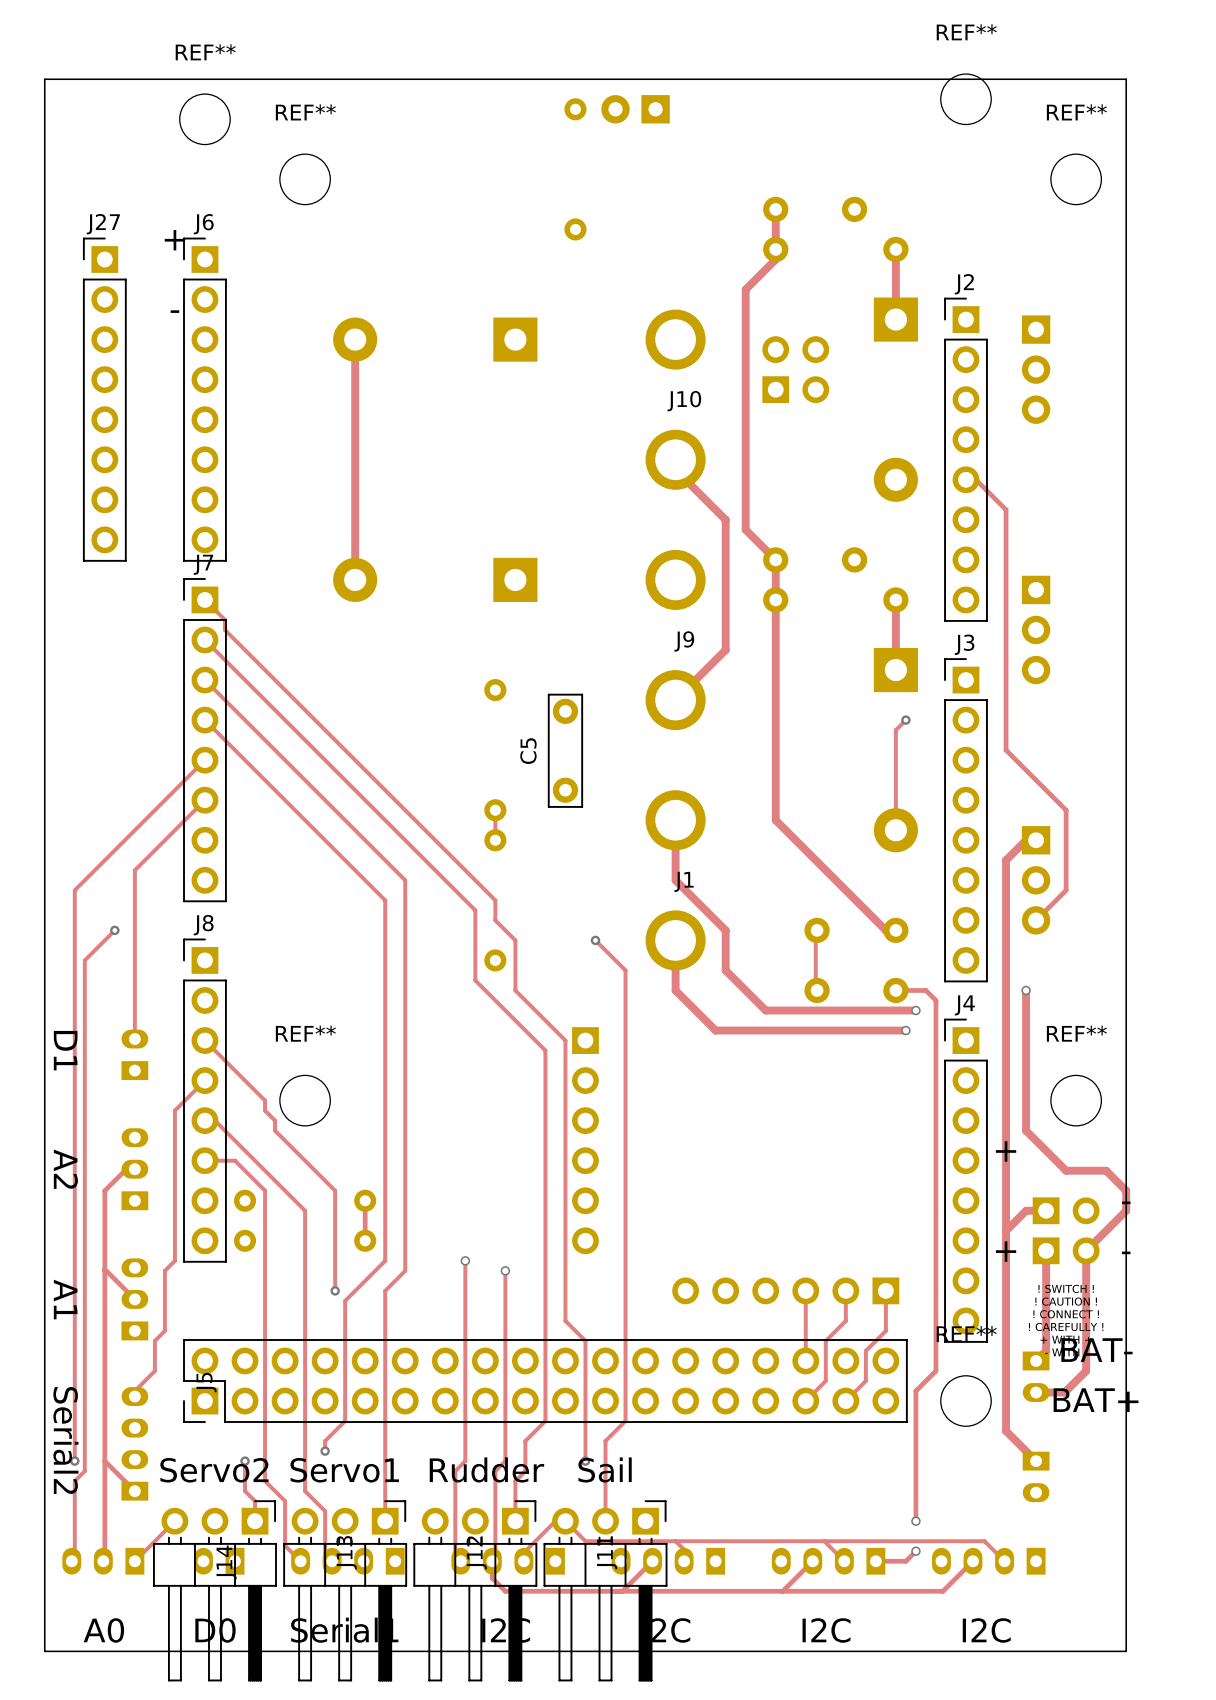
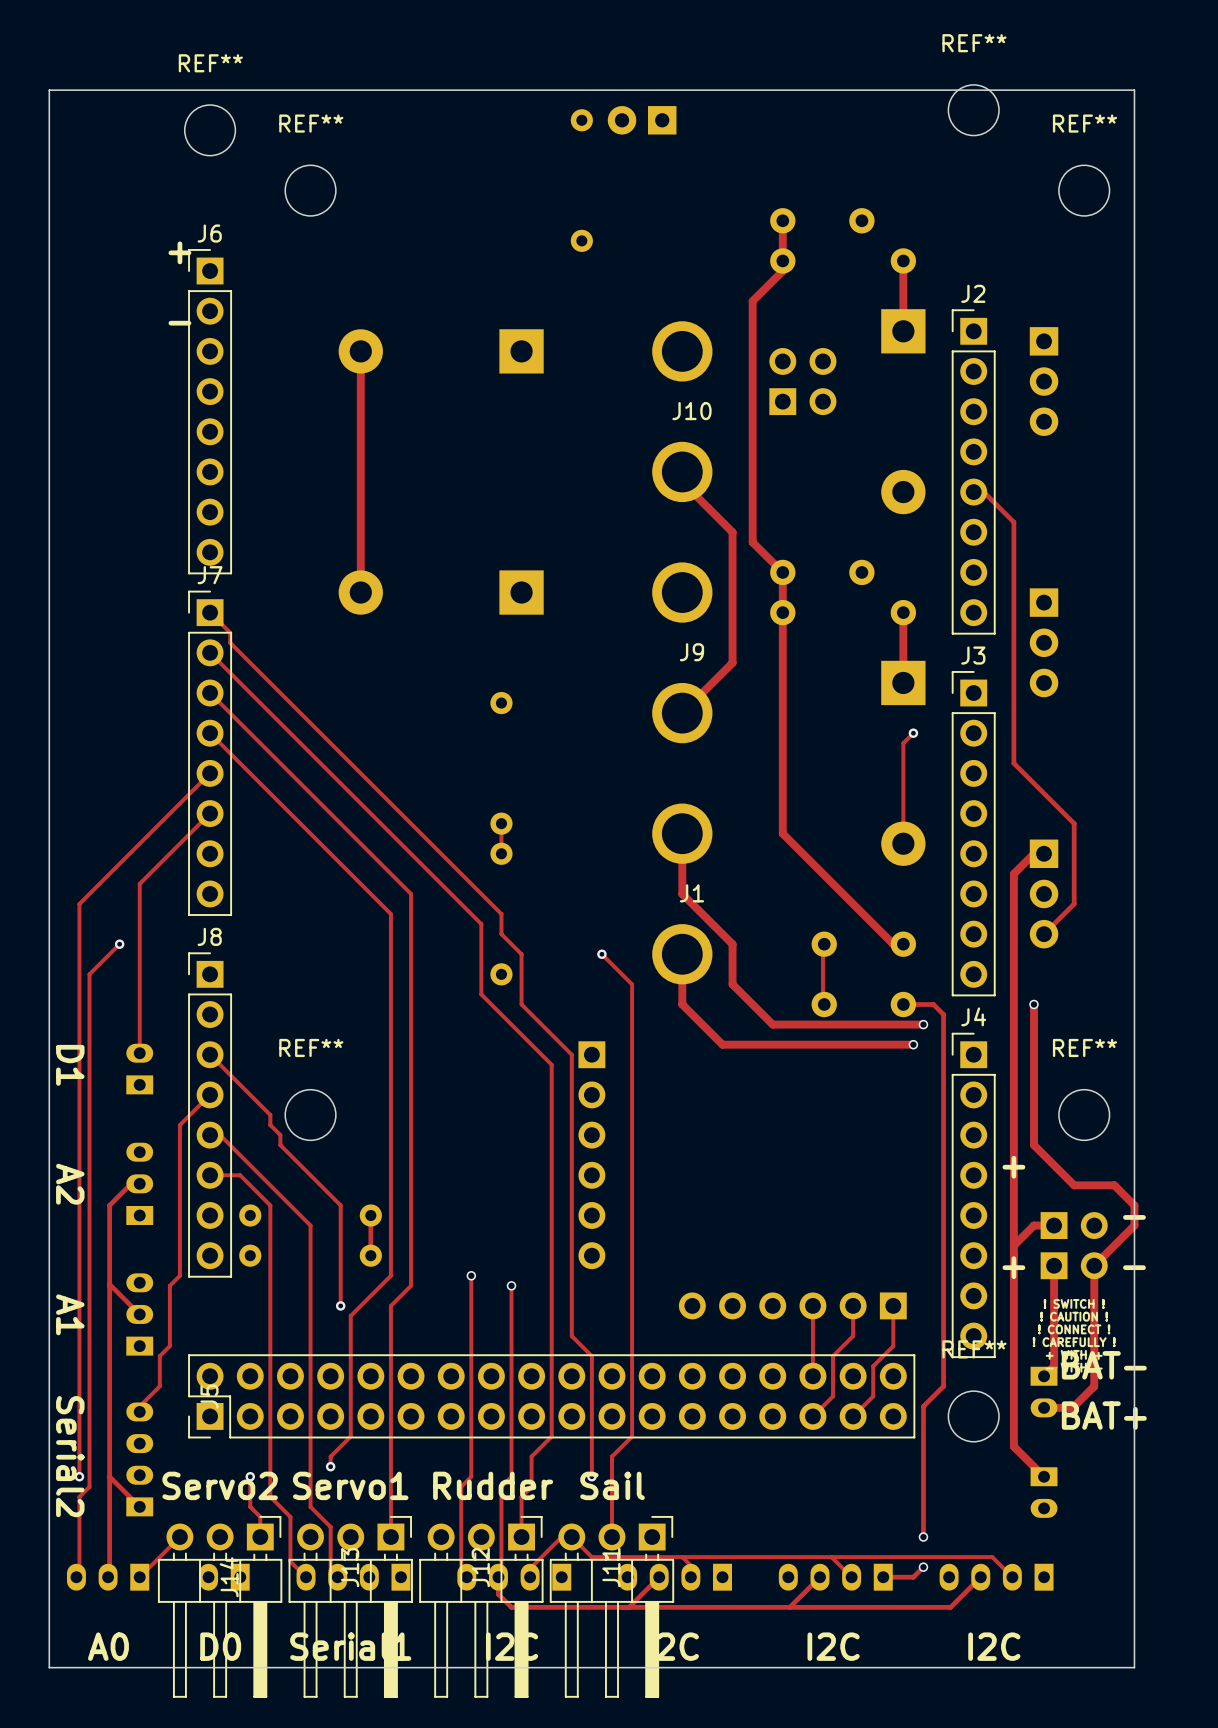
J27: (104, 399) -> none
C5: (565, 750) -> none

